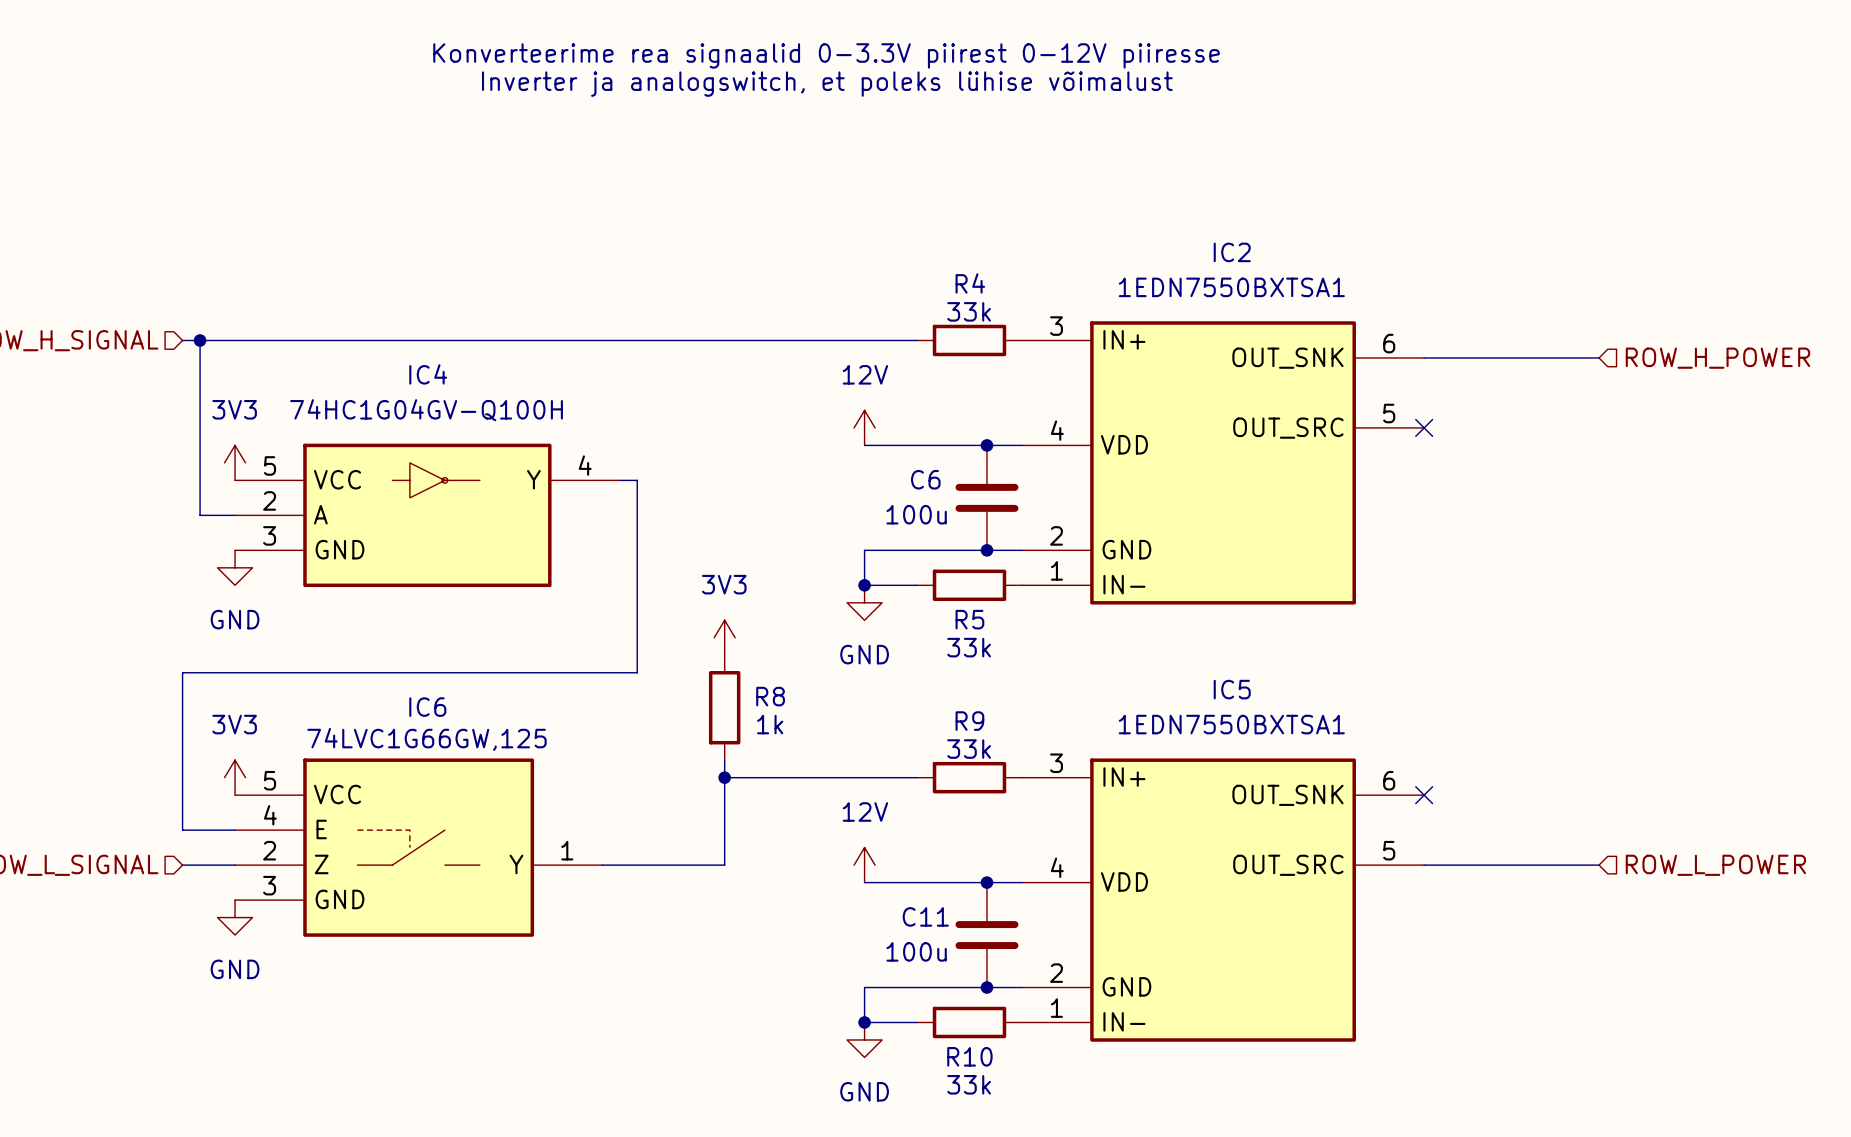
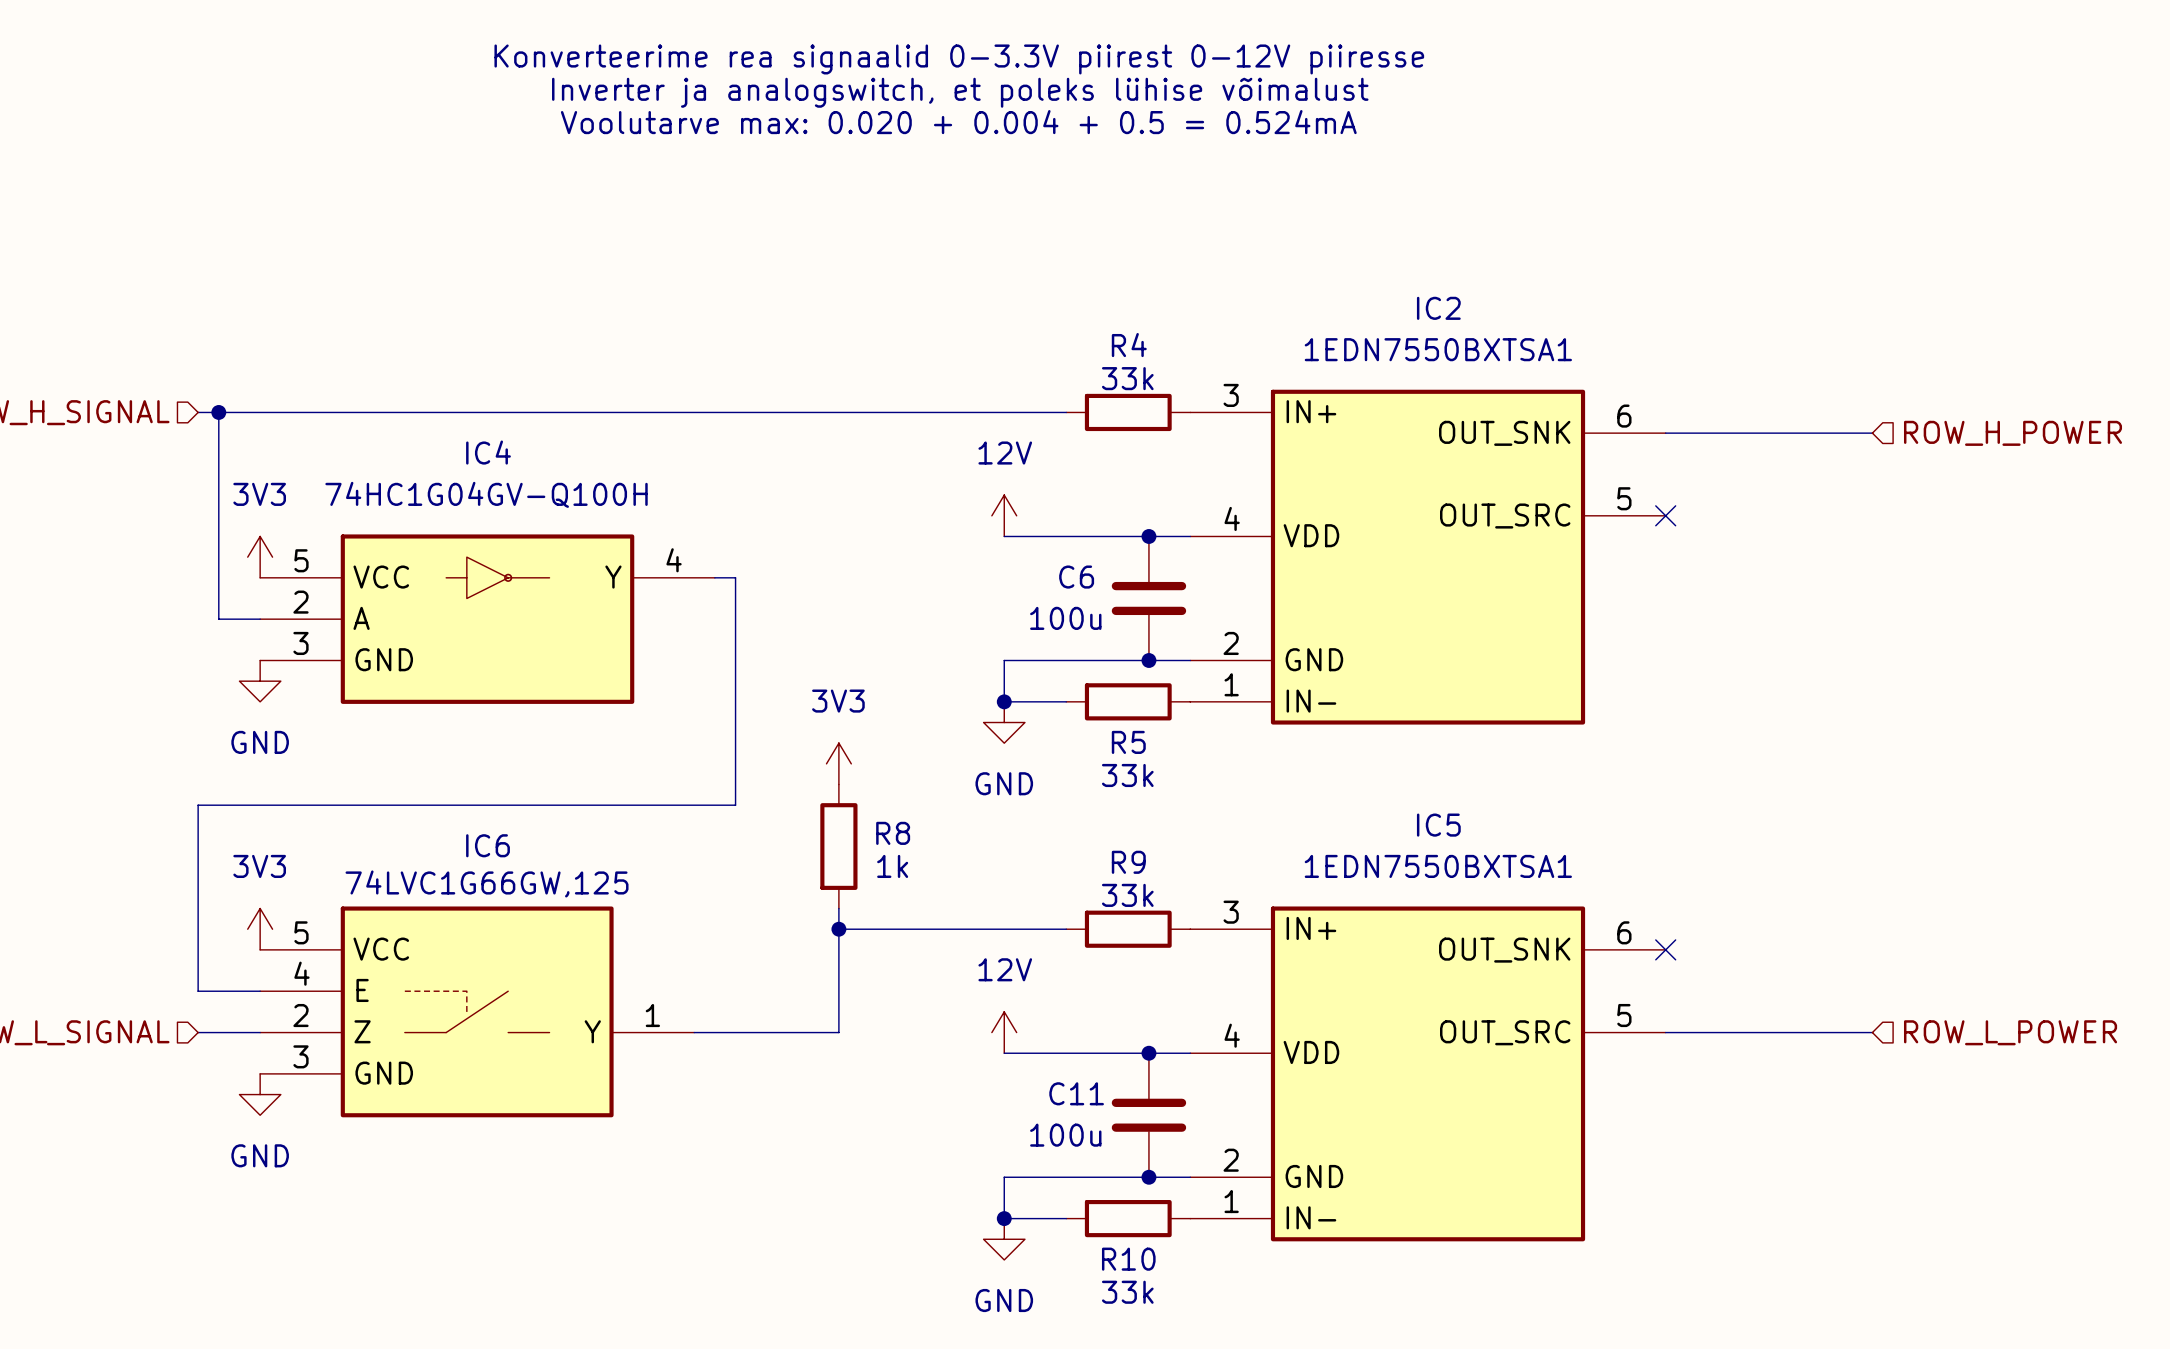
text position: Konverteerime rea signaalid 0-3.3V piirest 0-12V piiresse (826, 55) -> Konverteerime rea signaalid 0-3.3V piirest 0-12V piiresse (959, 59)
text position: Inverter ja analogswitch, et poleks lühise võimalust (827, 84) -> Inverter ja analogswitch, et poleks lühise võimalust (960, 92)
text: none -> Voolutarve max: 0.020 + 0.004 + 0.5 = 0.524mA (958, 122)

